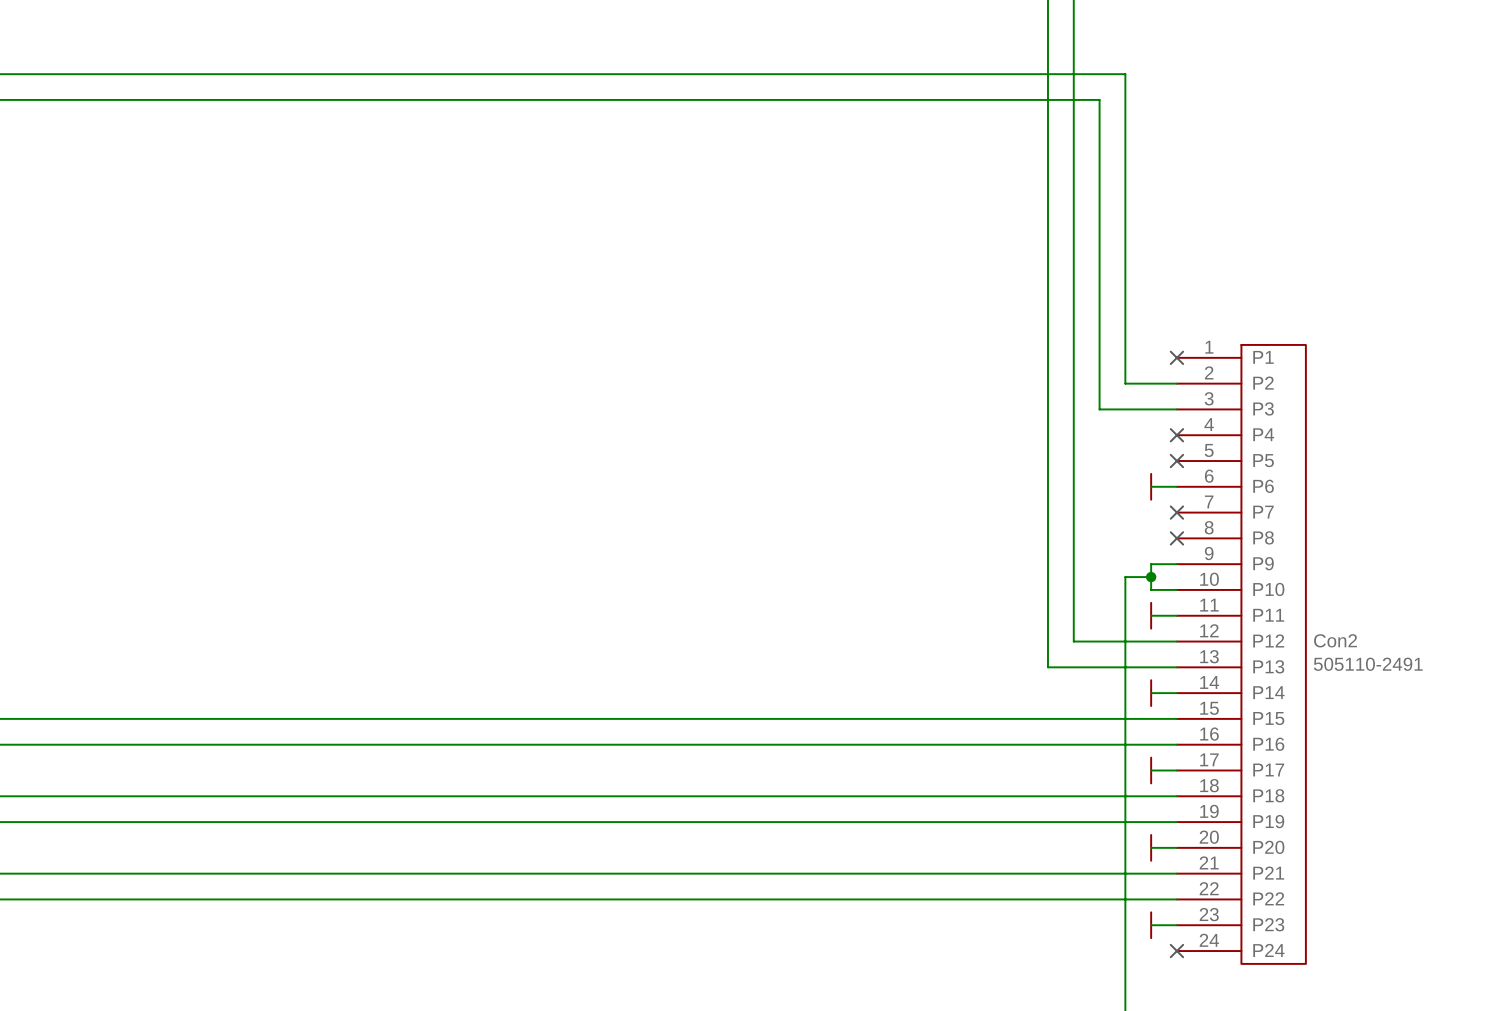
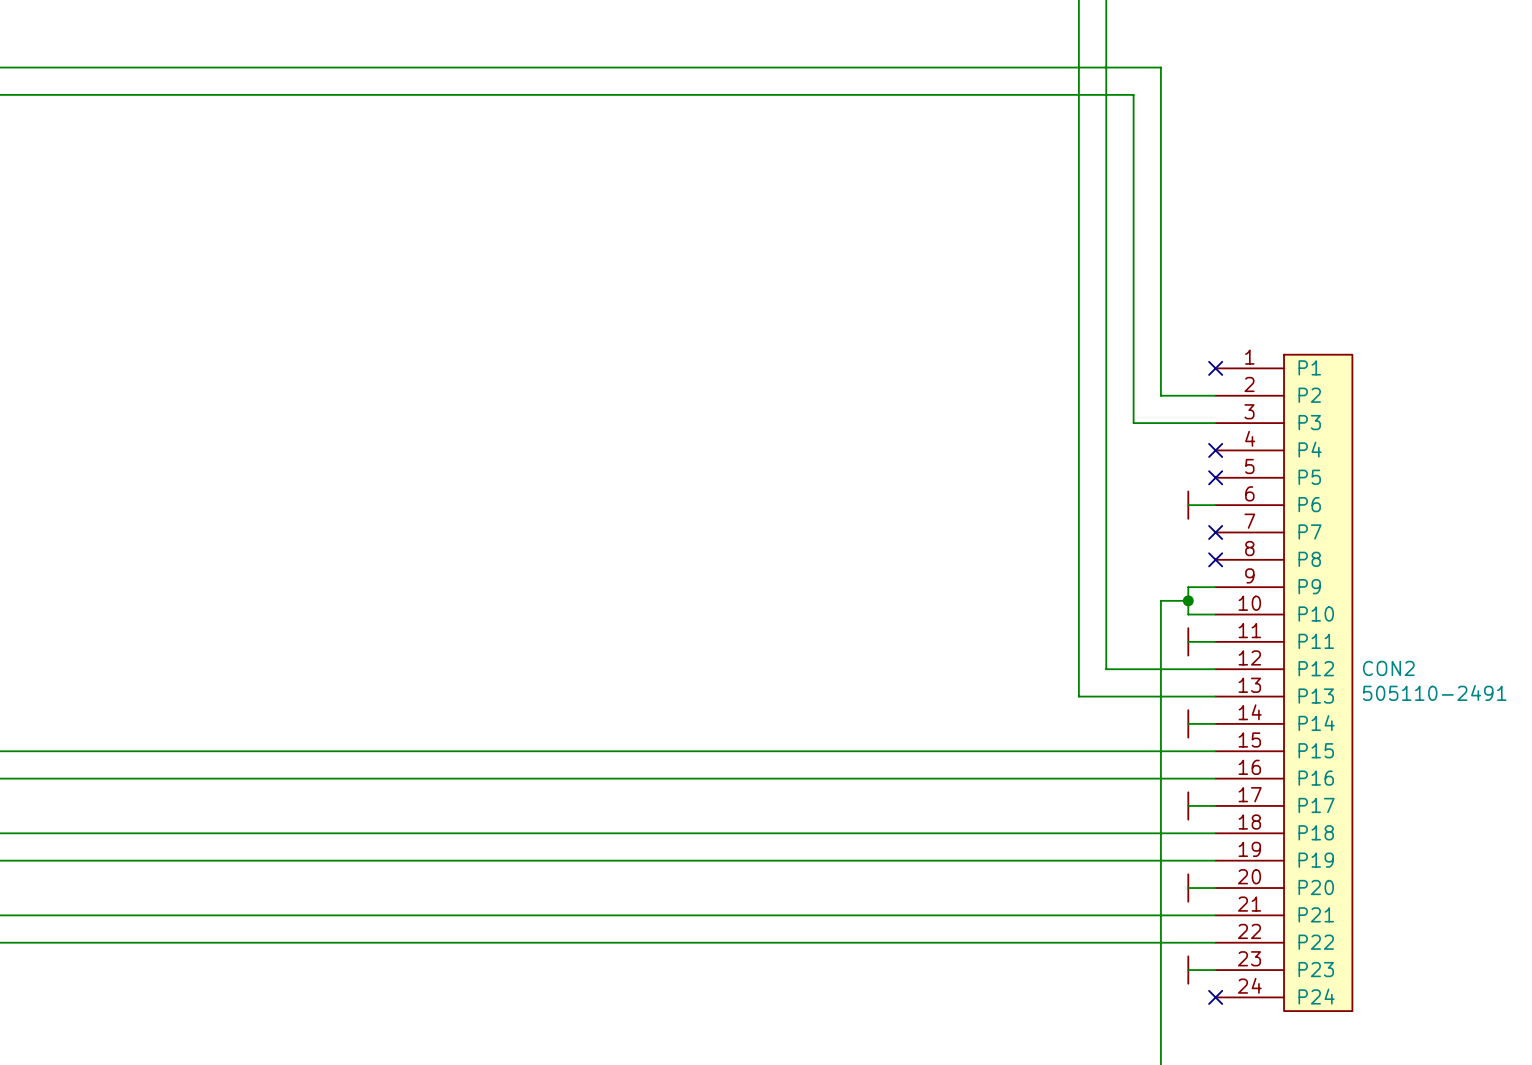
Con2 name: Con2 (1335, 640) -> CON2 (1388, 668)

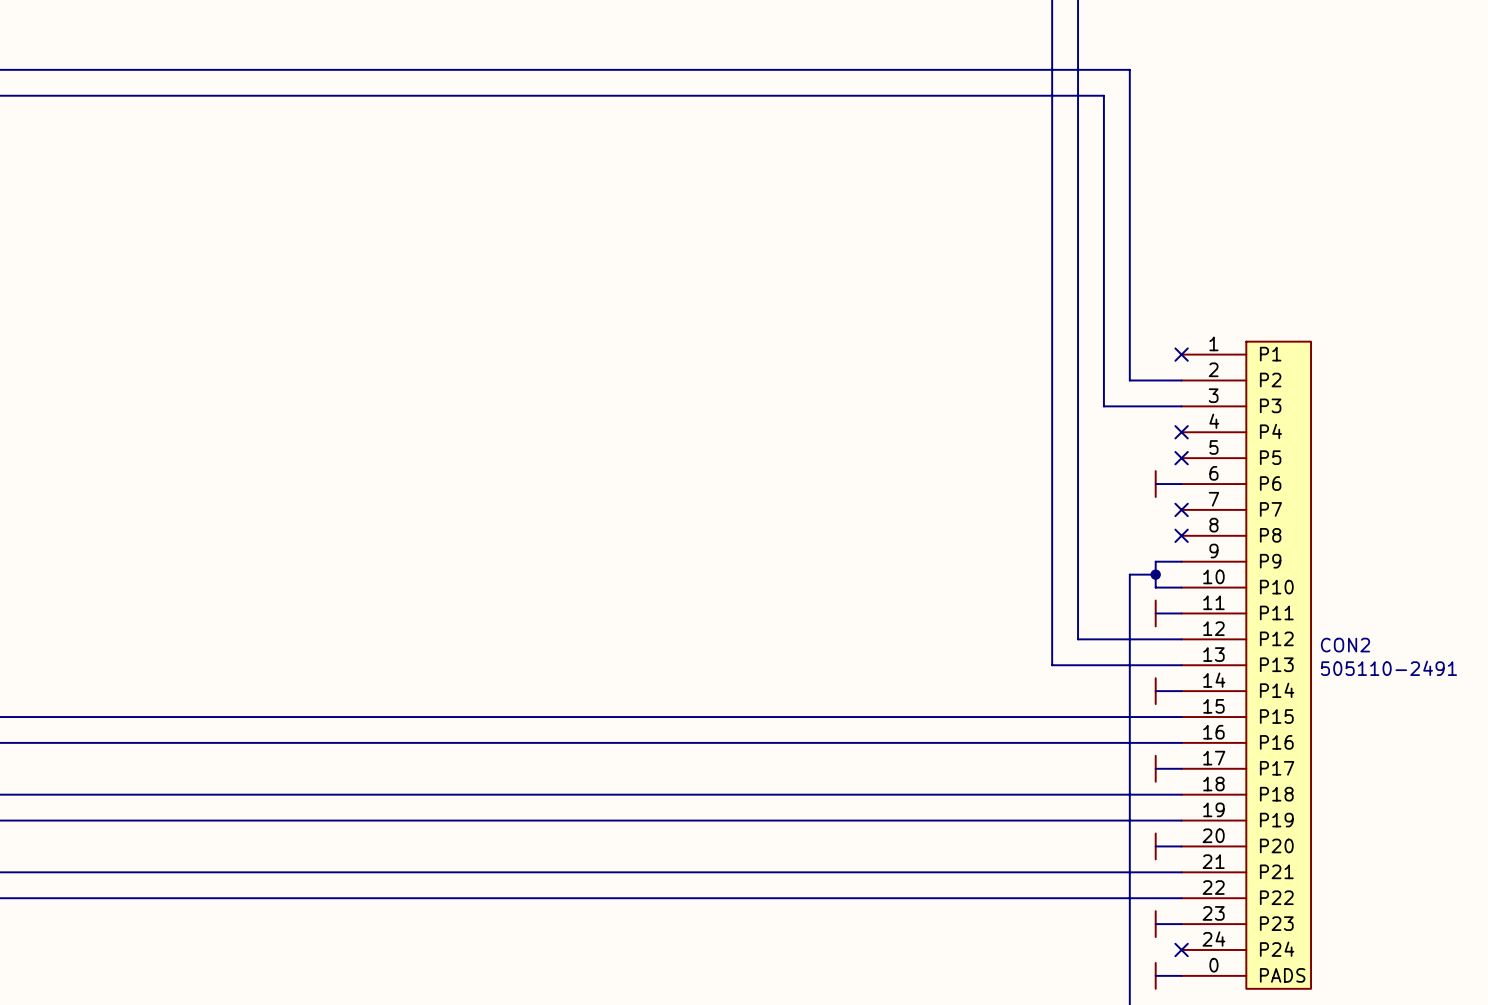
CON2 symbol: [1215, 354, 1353, 1012] -> [1181, 341, 1312, 989]
wire: none -> (1155, 975) (1181, 975)
power symbol: none -> (1155, 975)

